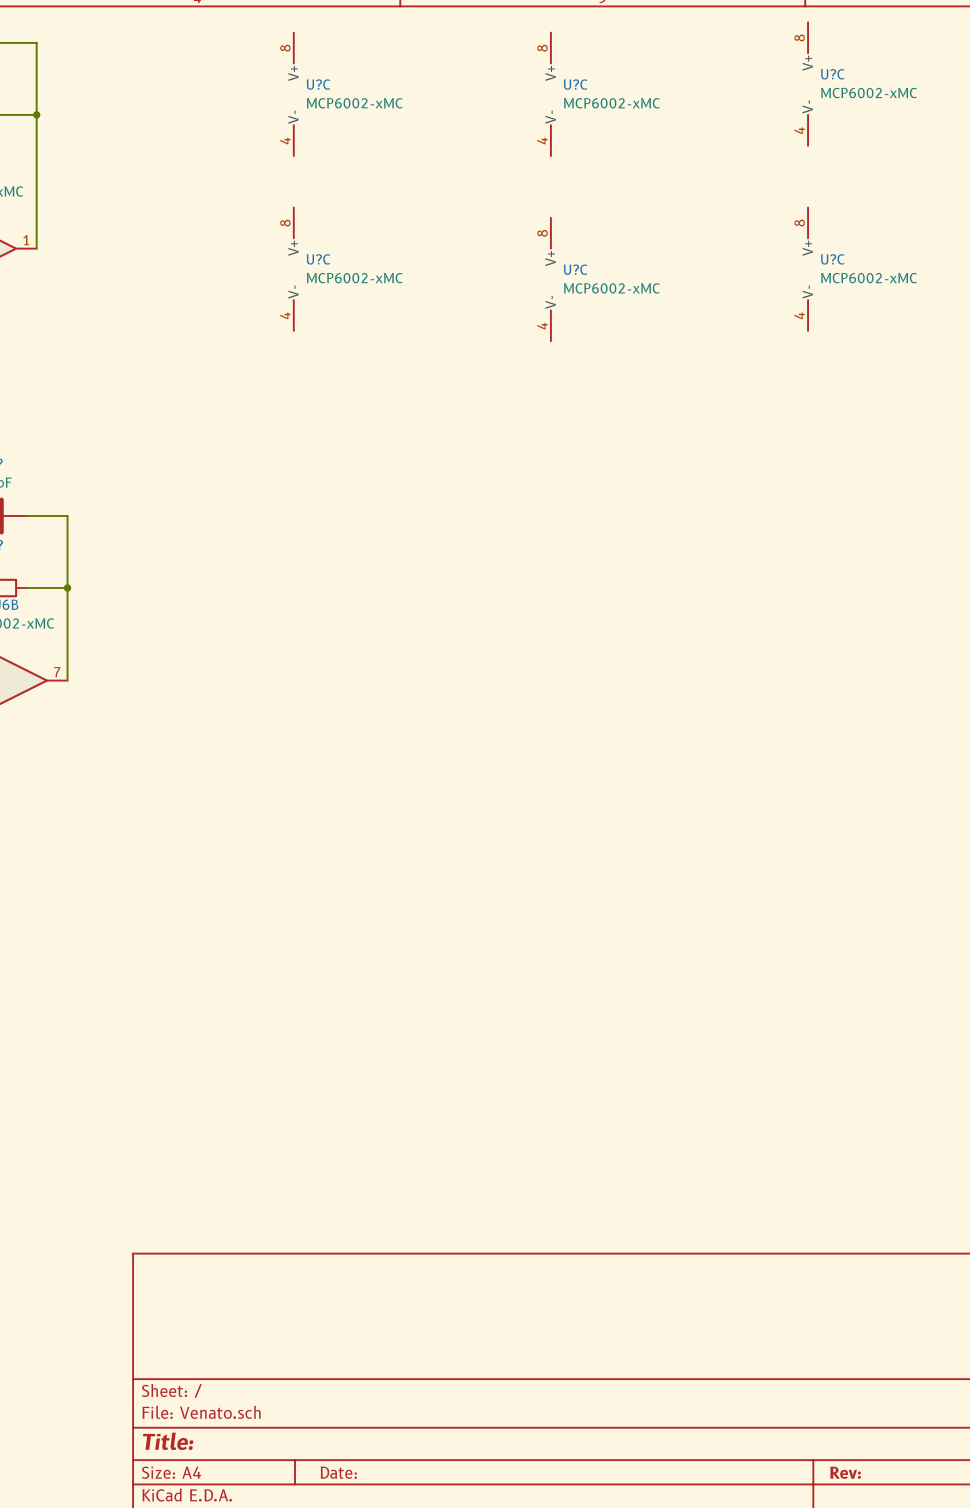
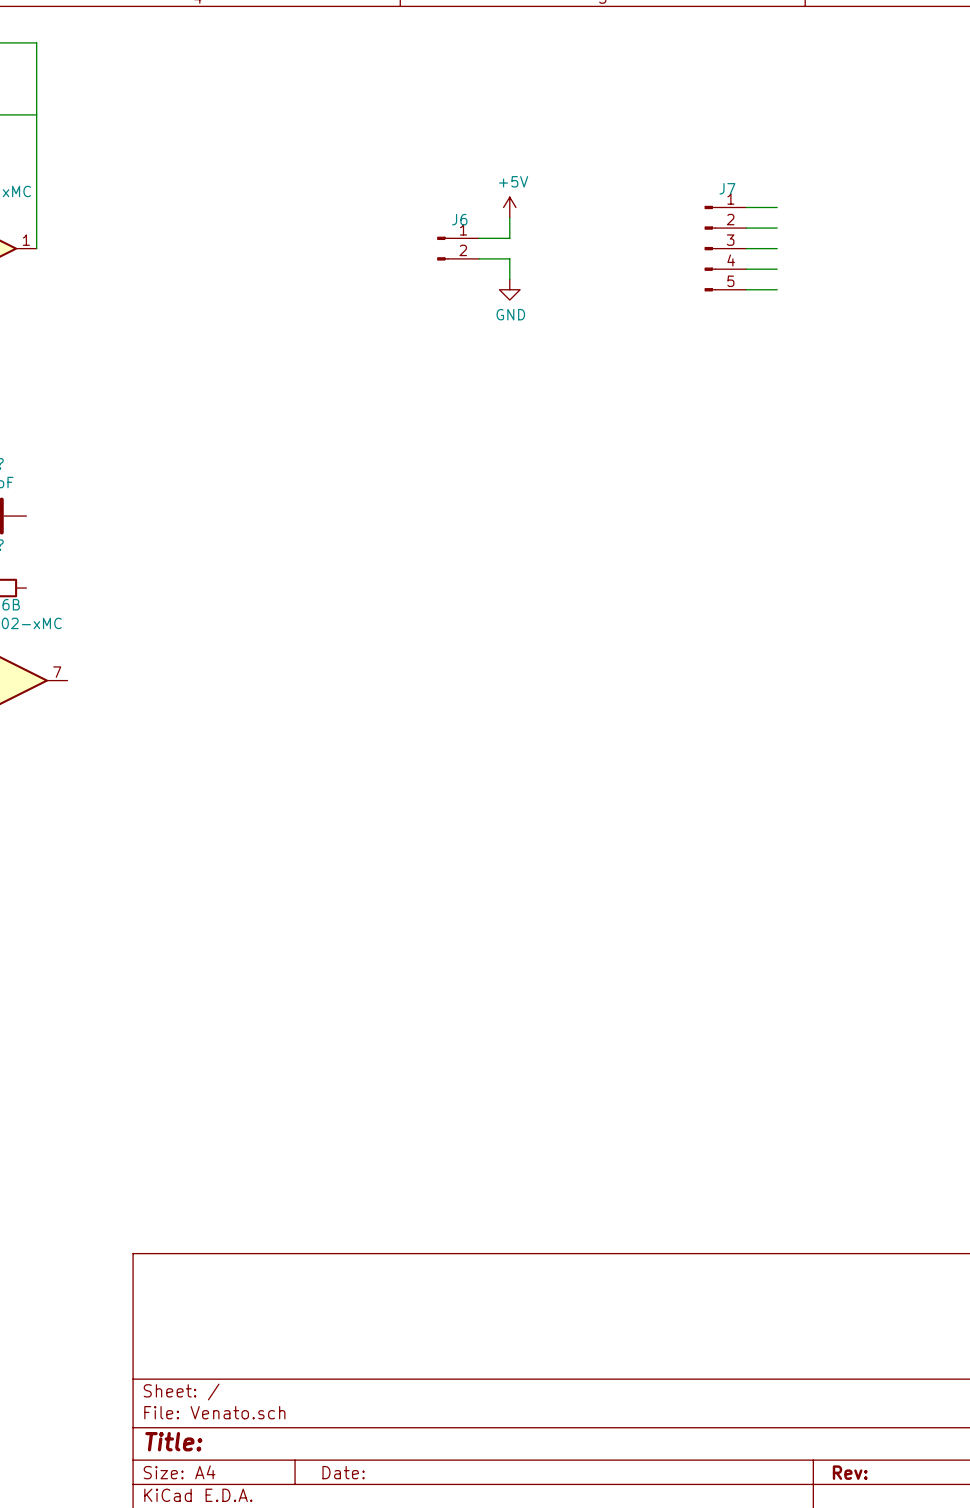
U?C: MCP6002-xMC (808, 84) -> none
U?C: MCP6002-xMC (293, 94) -> none
U?C: MCP6002-xMC (550, 94) -> none
junction: (36, 114) -> none
power symbol: none -> +5V (509, 207)
wire: none -> (746, 207) (777, 207)
wire: none -> (509, 217) (509, 238) (478, 238)
wire: none -> (746, 228) (777, 228)
J6: none -> (458, 248)
J7: none -> (725, 248)
wire: none -> (746, 248) (777, 248)
wire: none -> (478, 258) (509, 258) (509, 279)
U?C: MCP6002-xMC (293, 269) -> none
wire: none -> (746, 269) (777, 269)
U?C: MCP6002-xMC (808, 269) -> none
U?C: MCP6002-xMC (550, 279) -> none
power symbol: none -> GND (509, 289)
wire: none -> (746, 289) (777, 289)
wire: (26, 516) (67, 516) (67, 680) -> none
wire: (26, 588) (67, 588) -> none
junction: (67, 588) -> none

